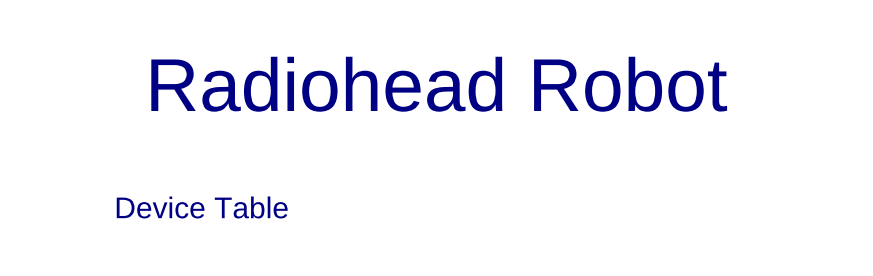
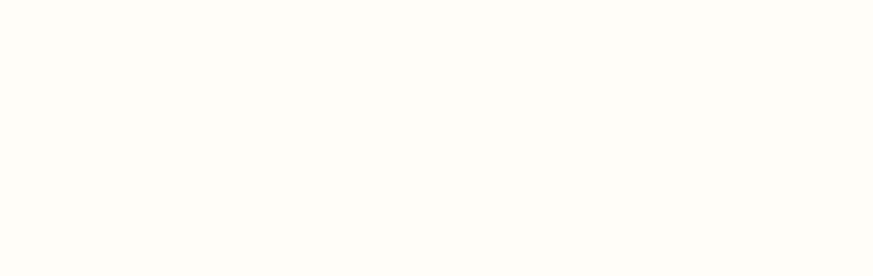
text: Radiohead Robot (439, 84) -> none
text: Device Table (202, 207) -> none

